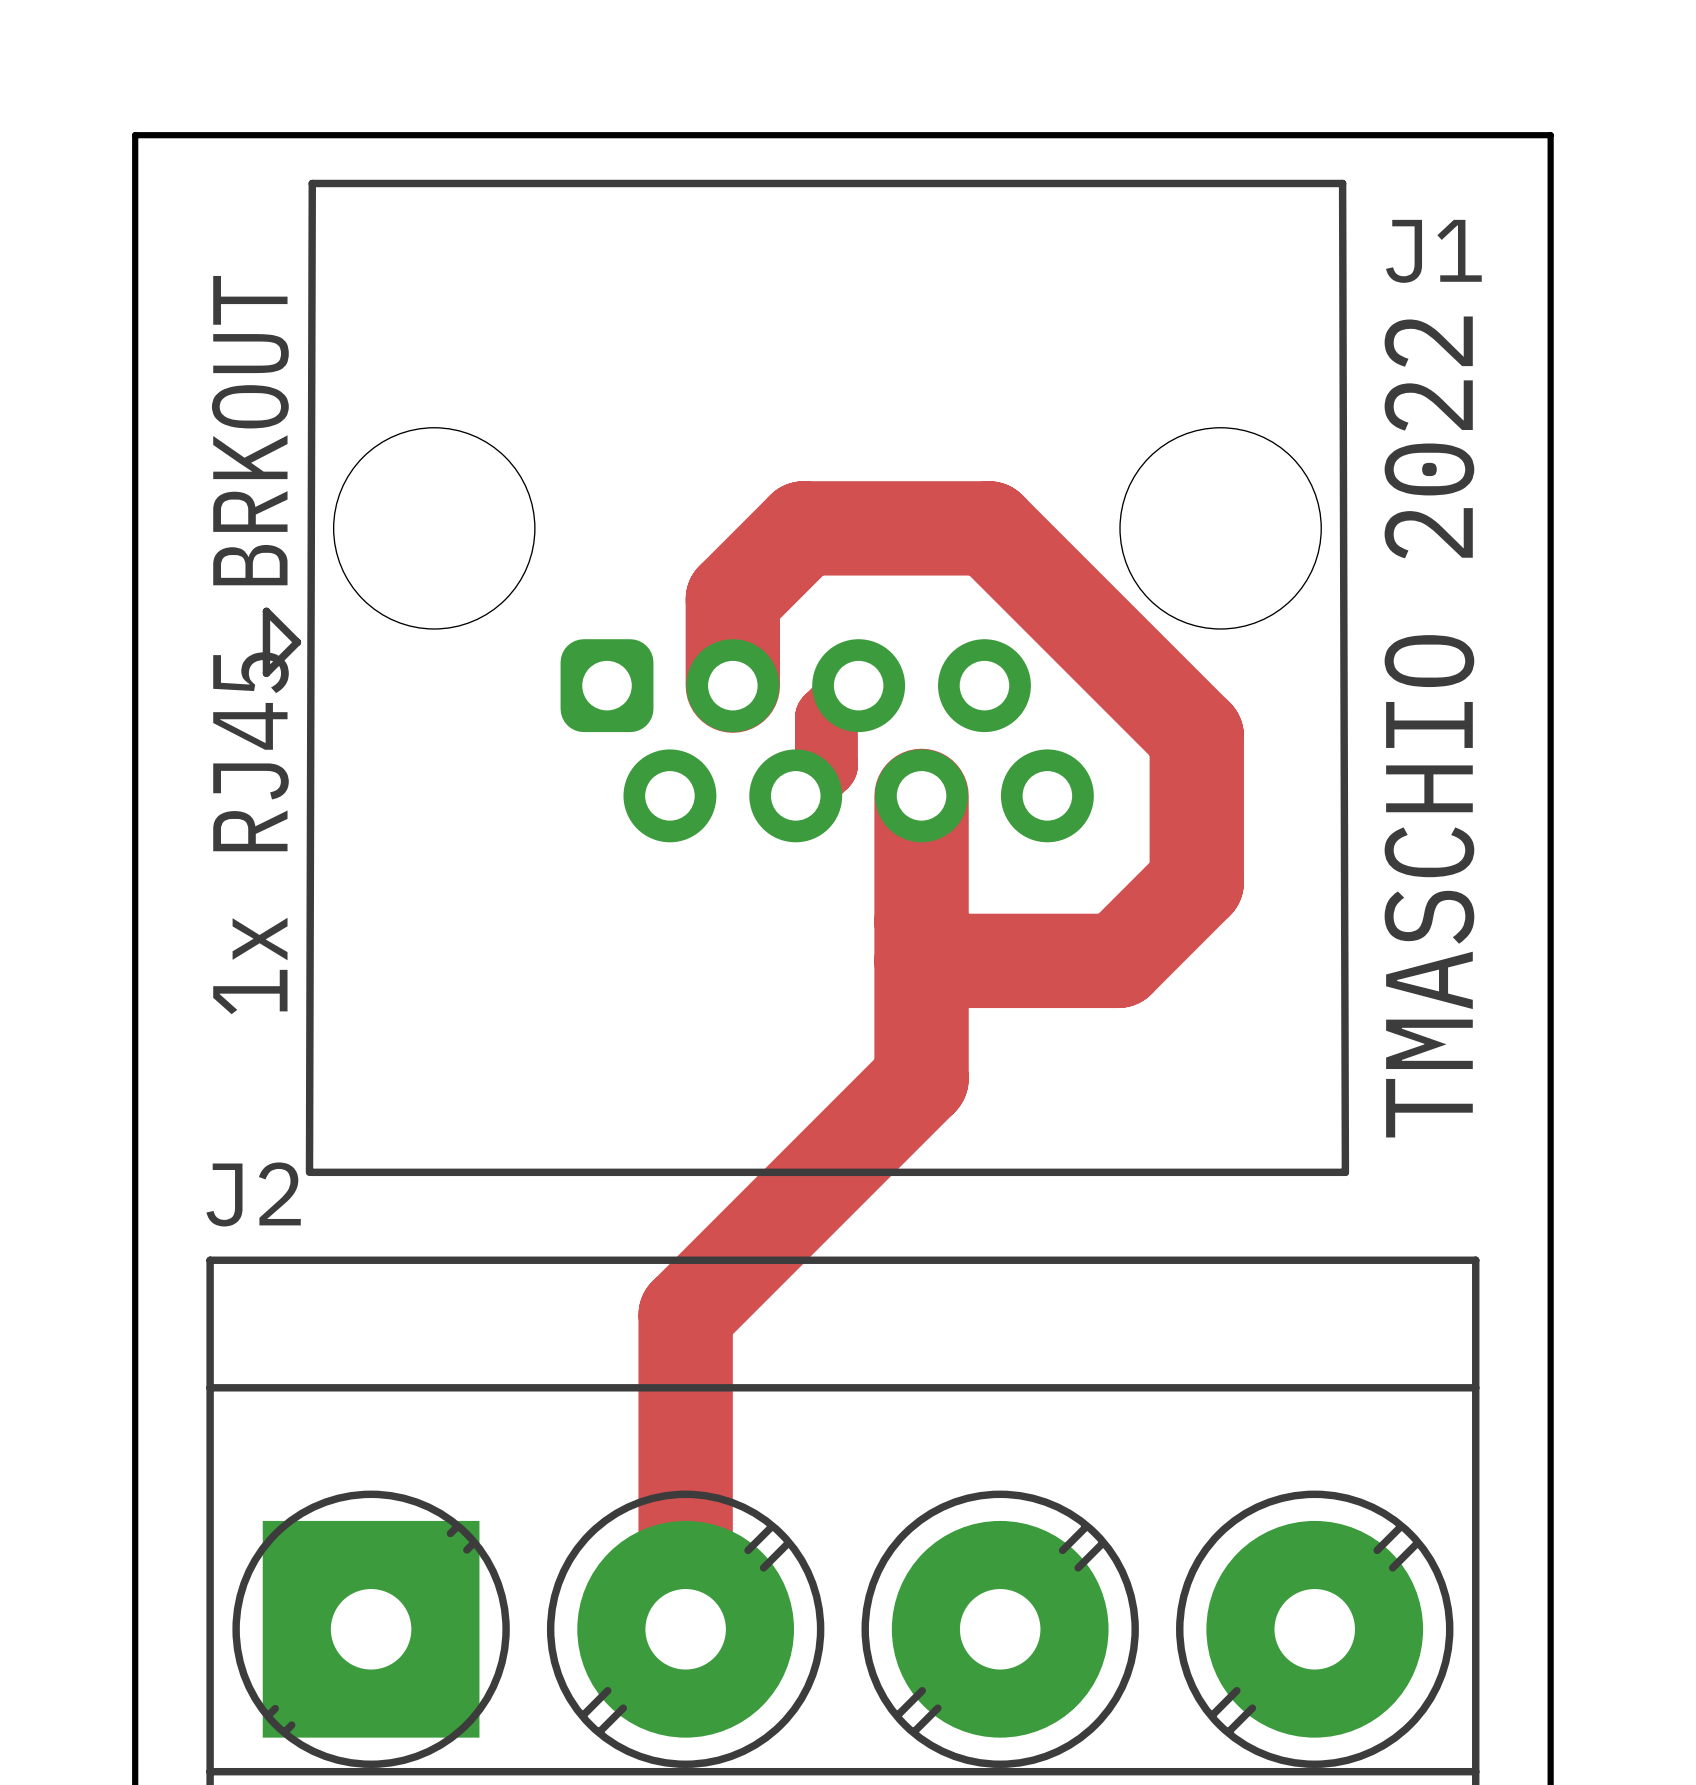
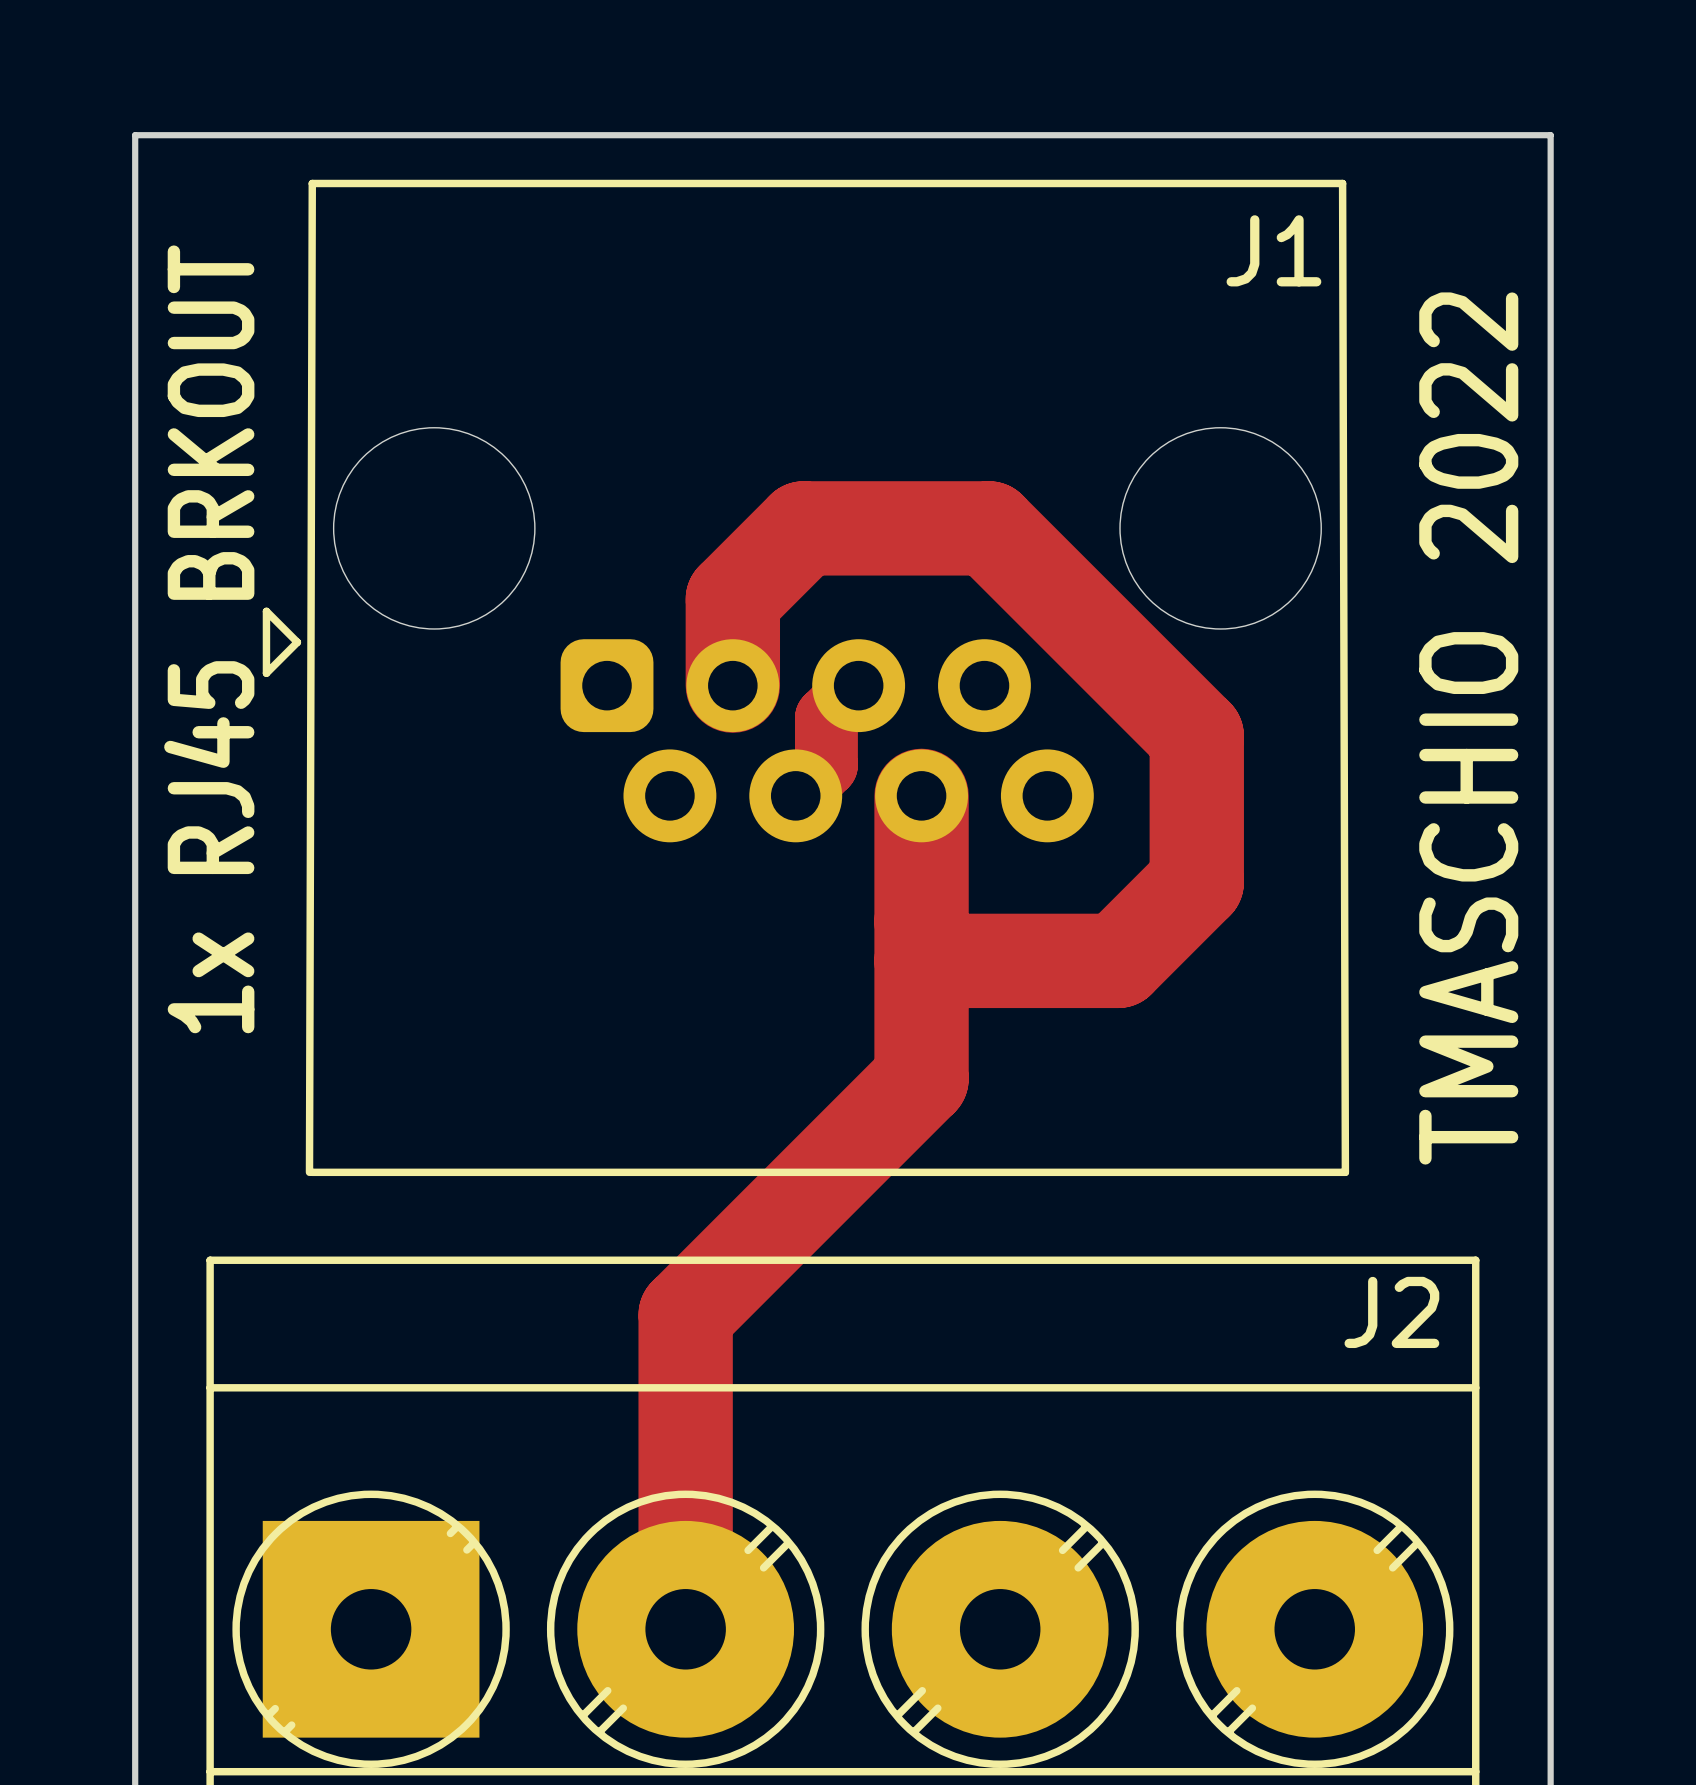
J1 name position: J1 (1433, 251) -> J1 (1273, 250)
text position: 1x RJ45 BRKOUT (250, 645) -> 1x RJ45 BRKOUT (209, 639)
text position: TMASCHIO 2022 (1429, 726) -> TMASCHIO 2022 (1468, 728)
J2 name position: J2 (253, 1194) -> J2 (1391, 1312)

